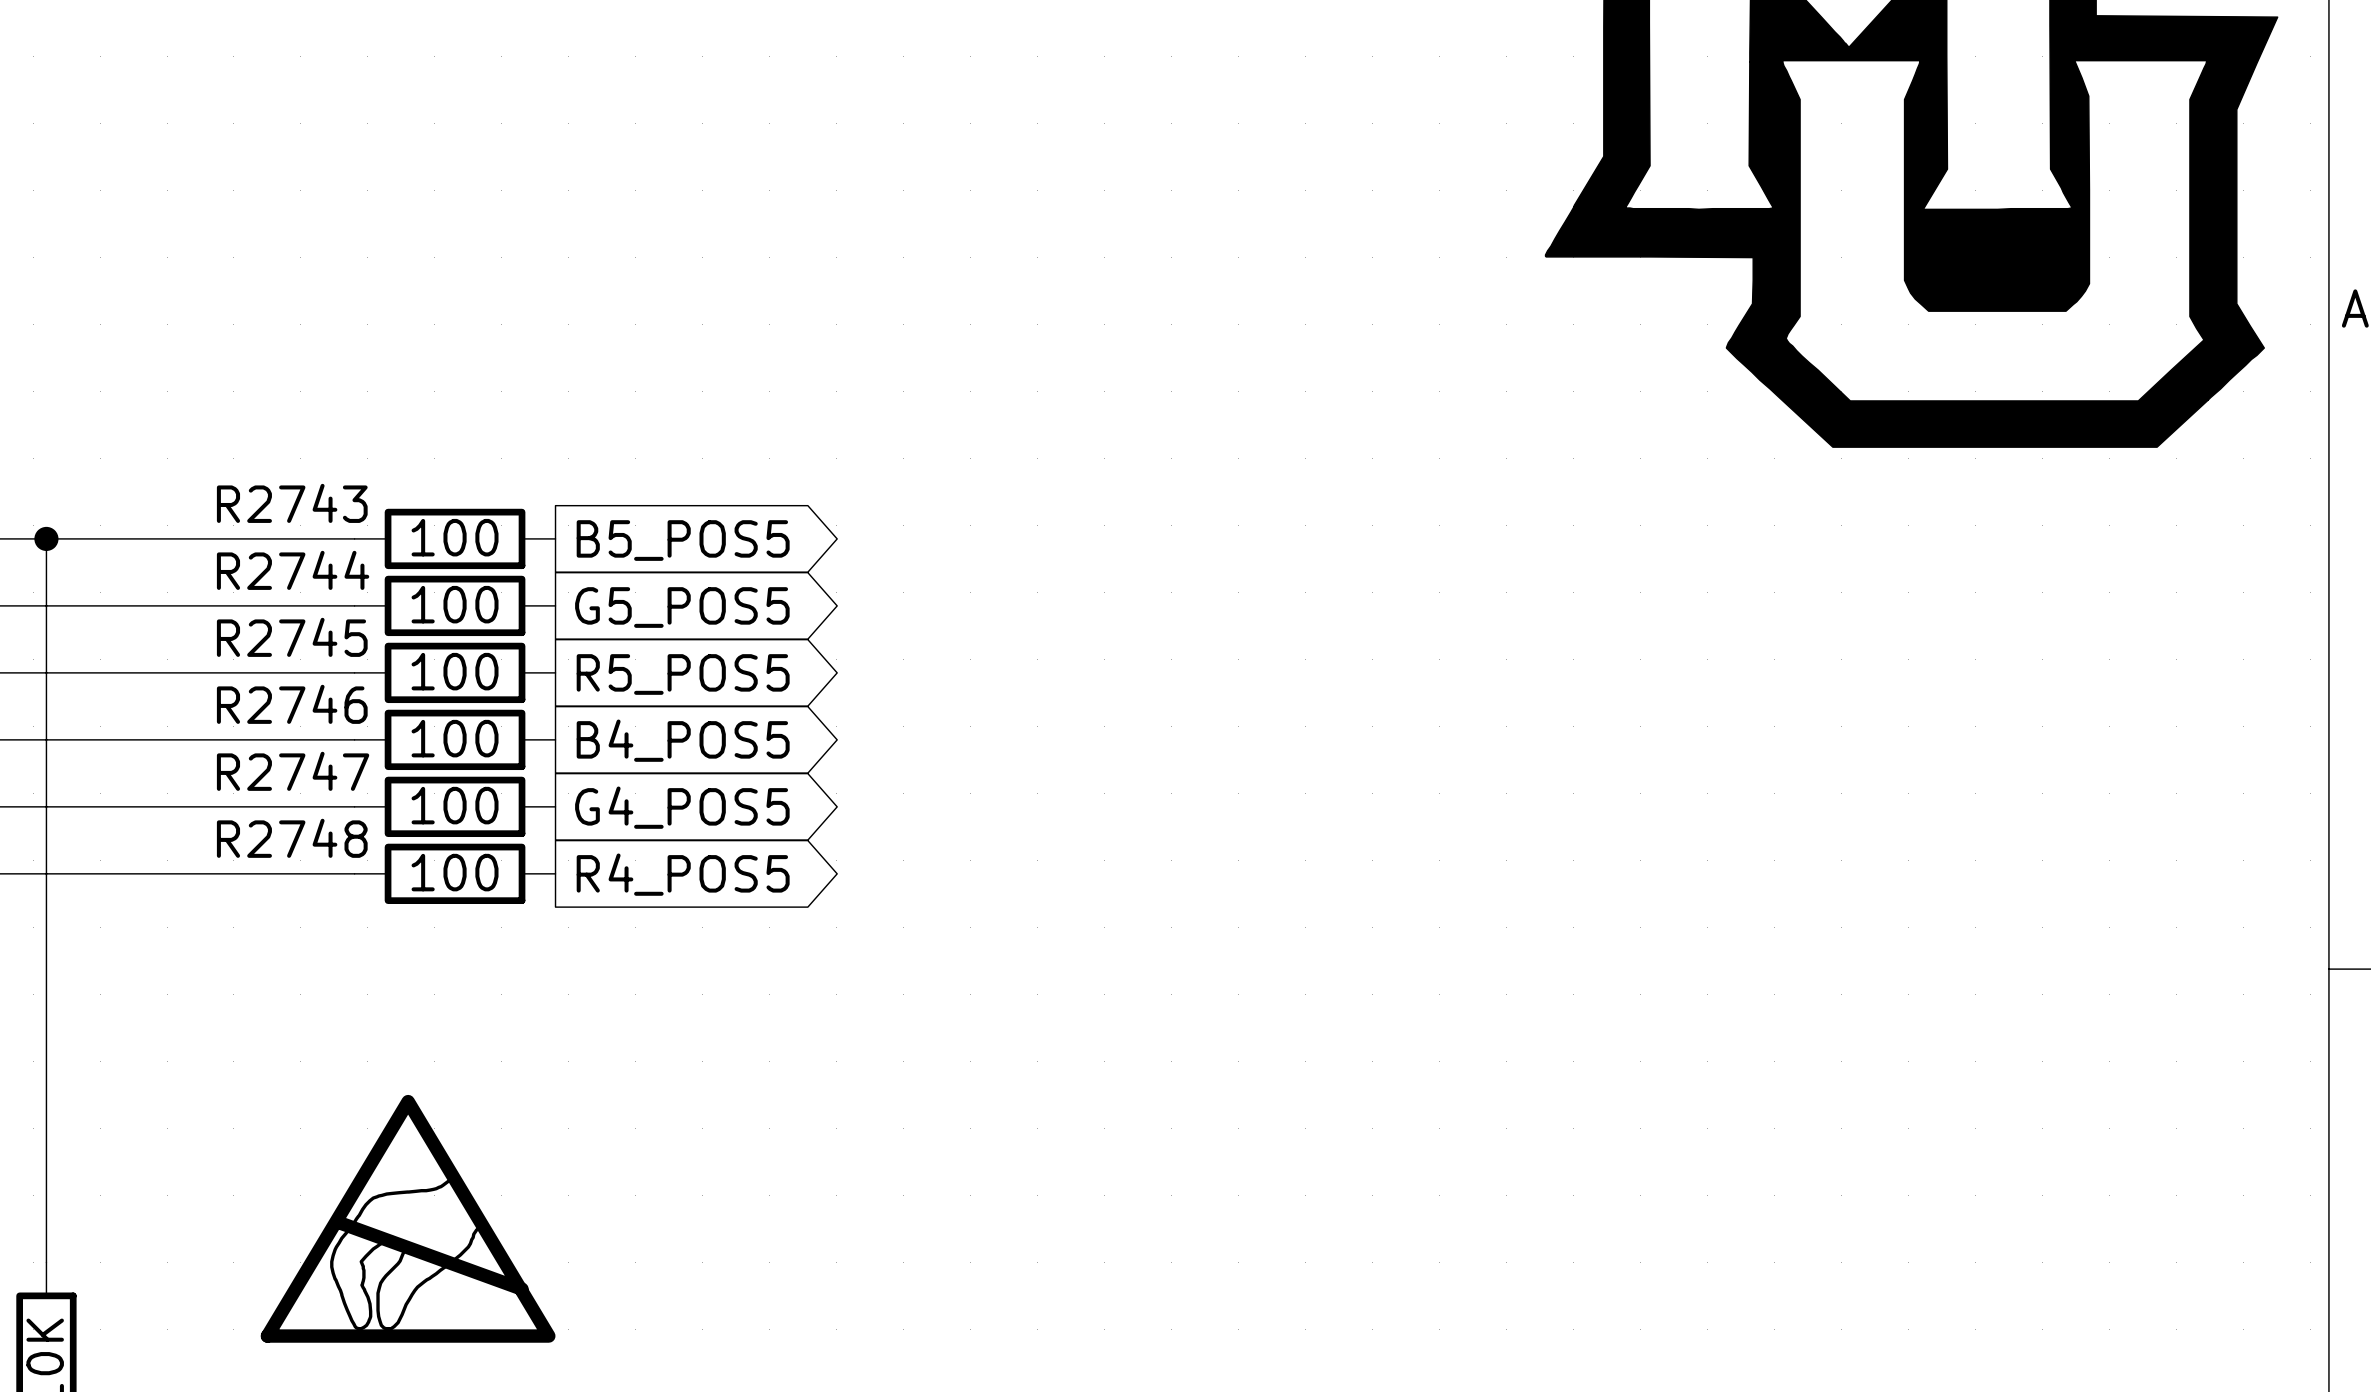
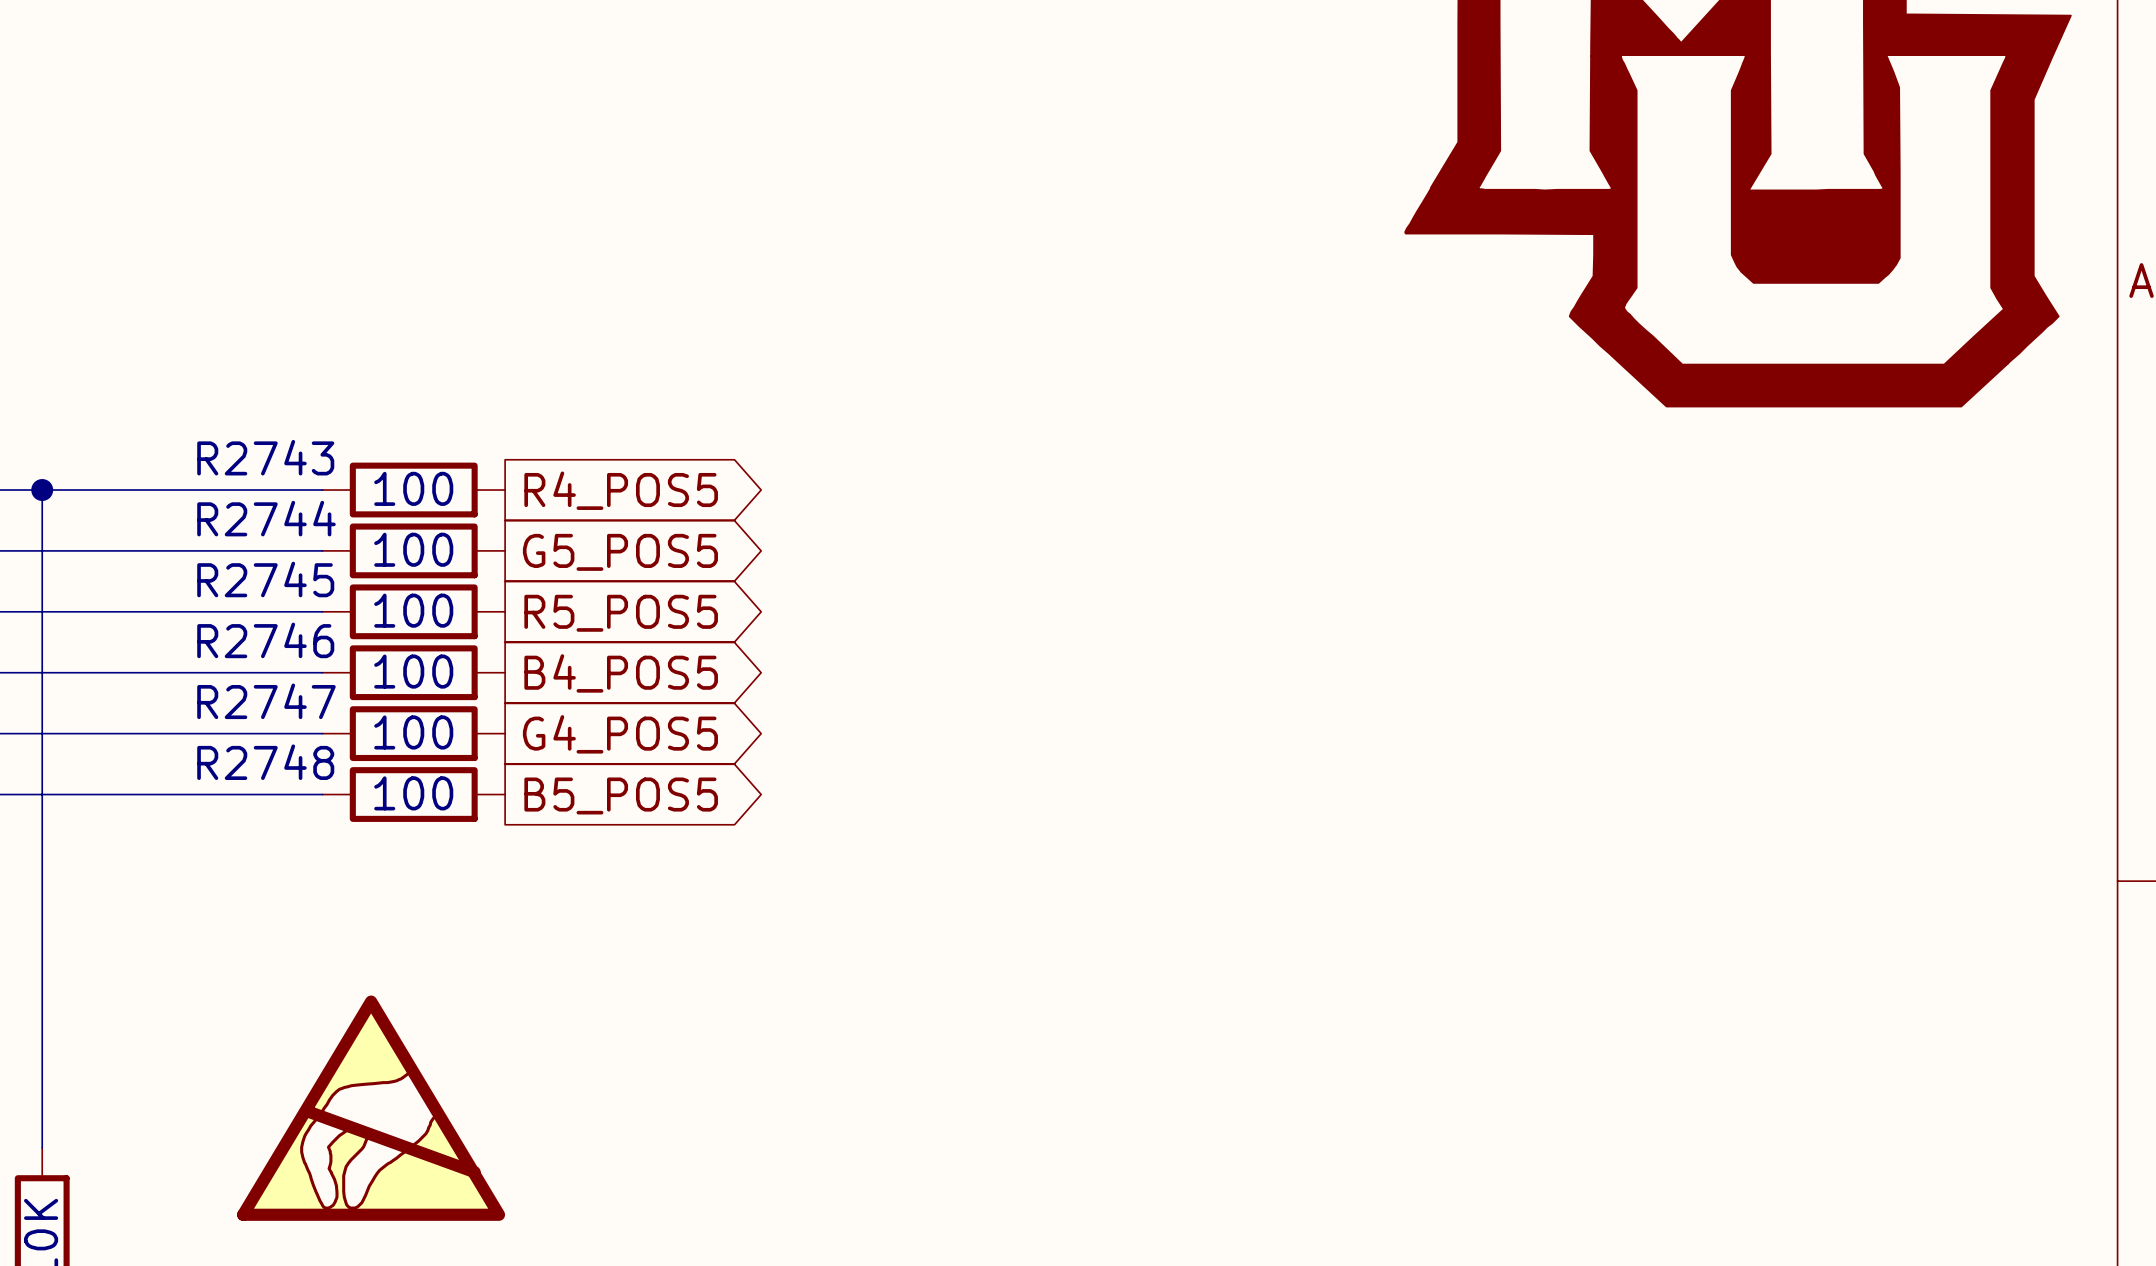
global label: B5_POS5 (683, 540) -> R4_POS5 (621, 490)
global label: R4_POS5 (683, 874) -> B5_POS5 (621, 795)

